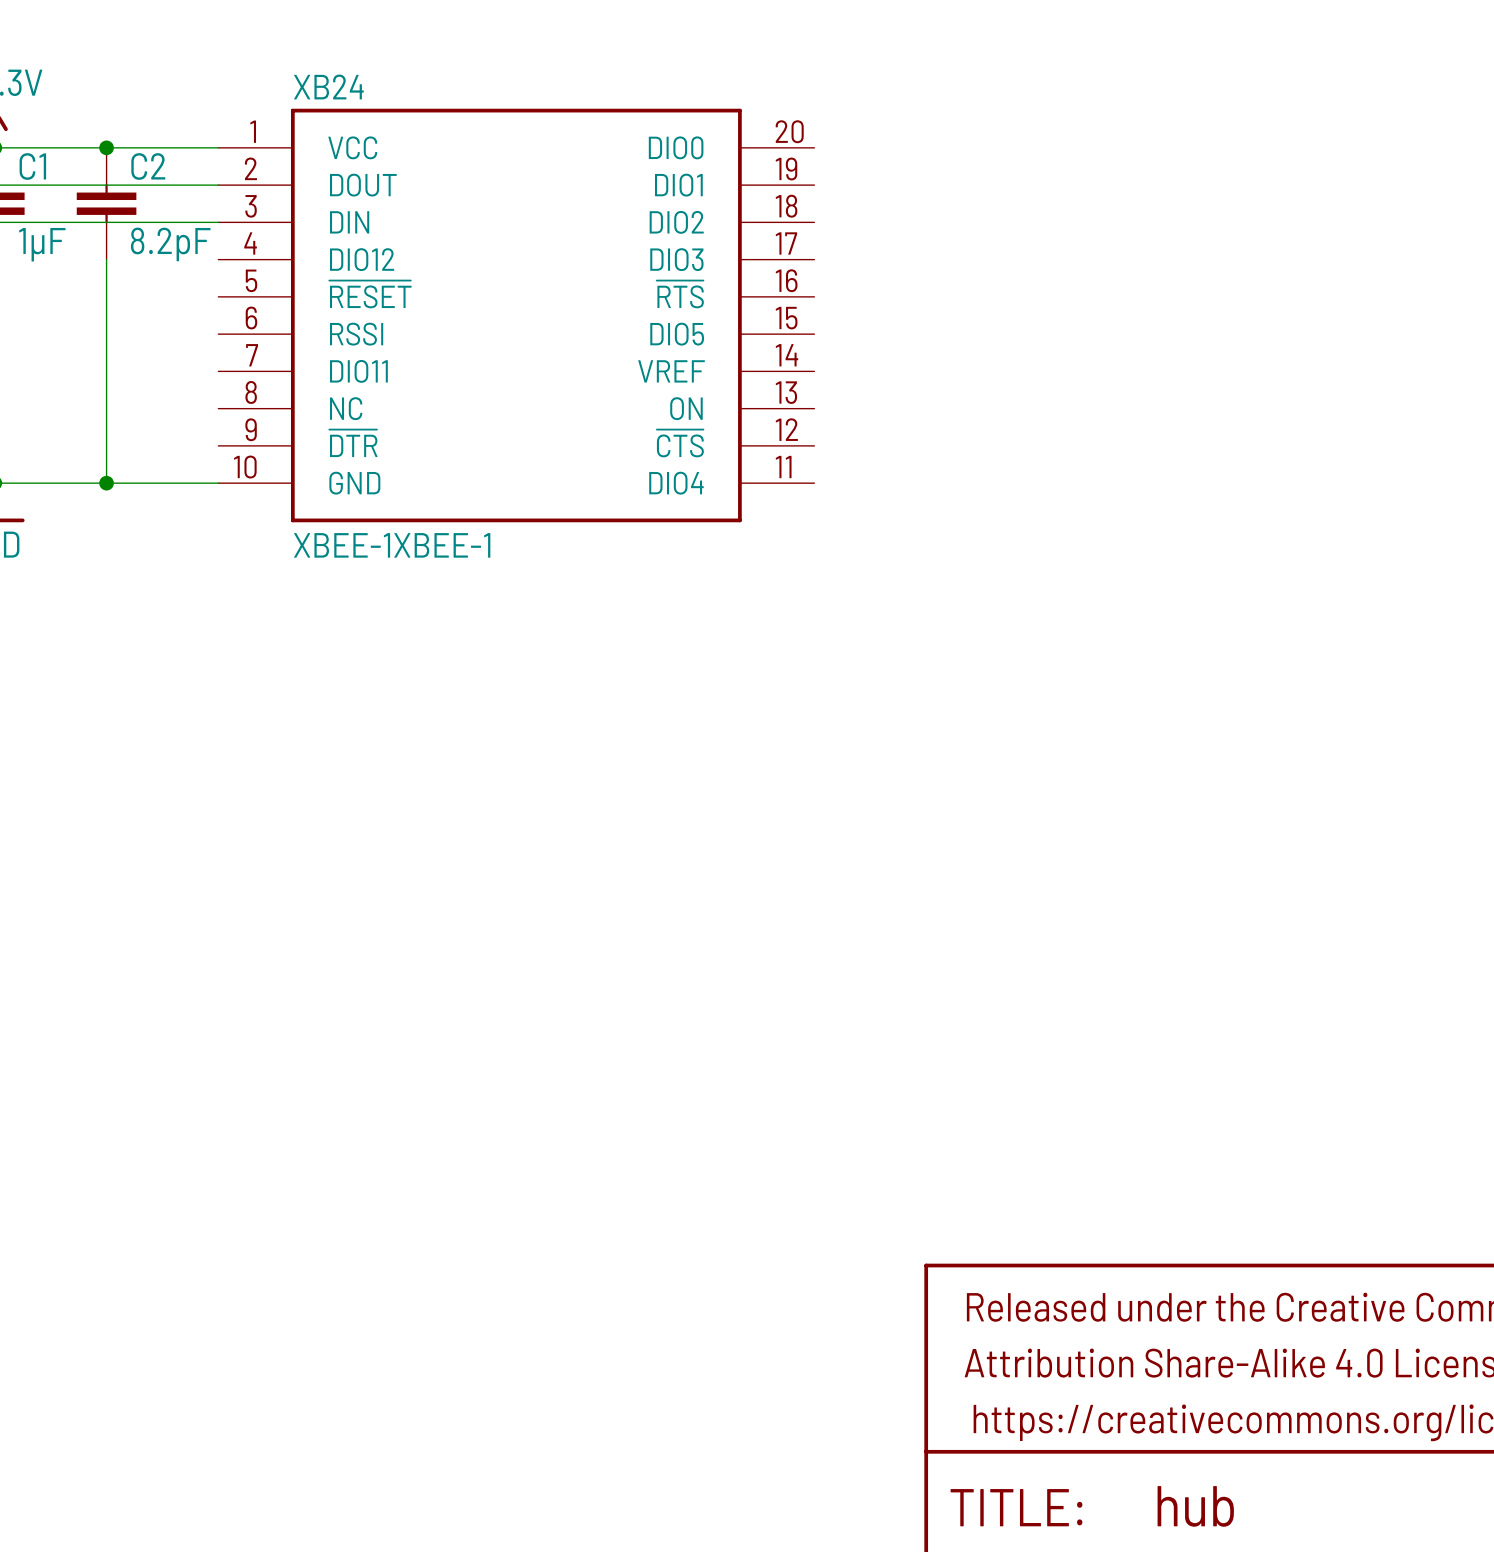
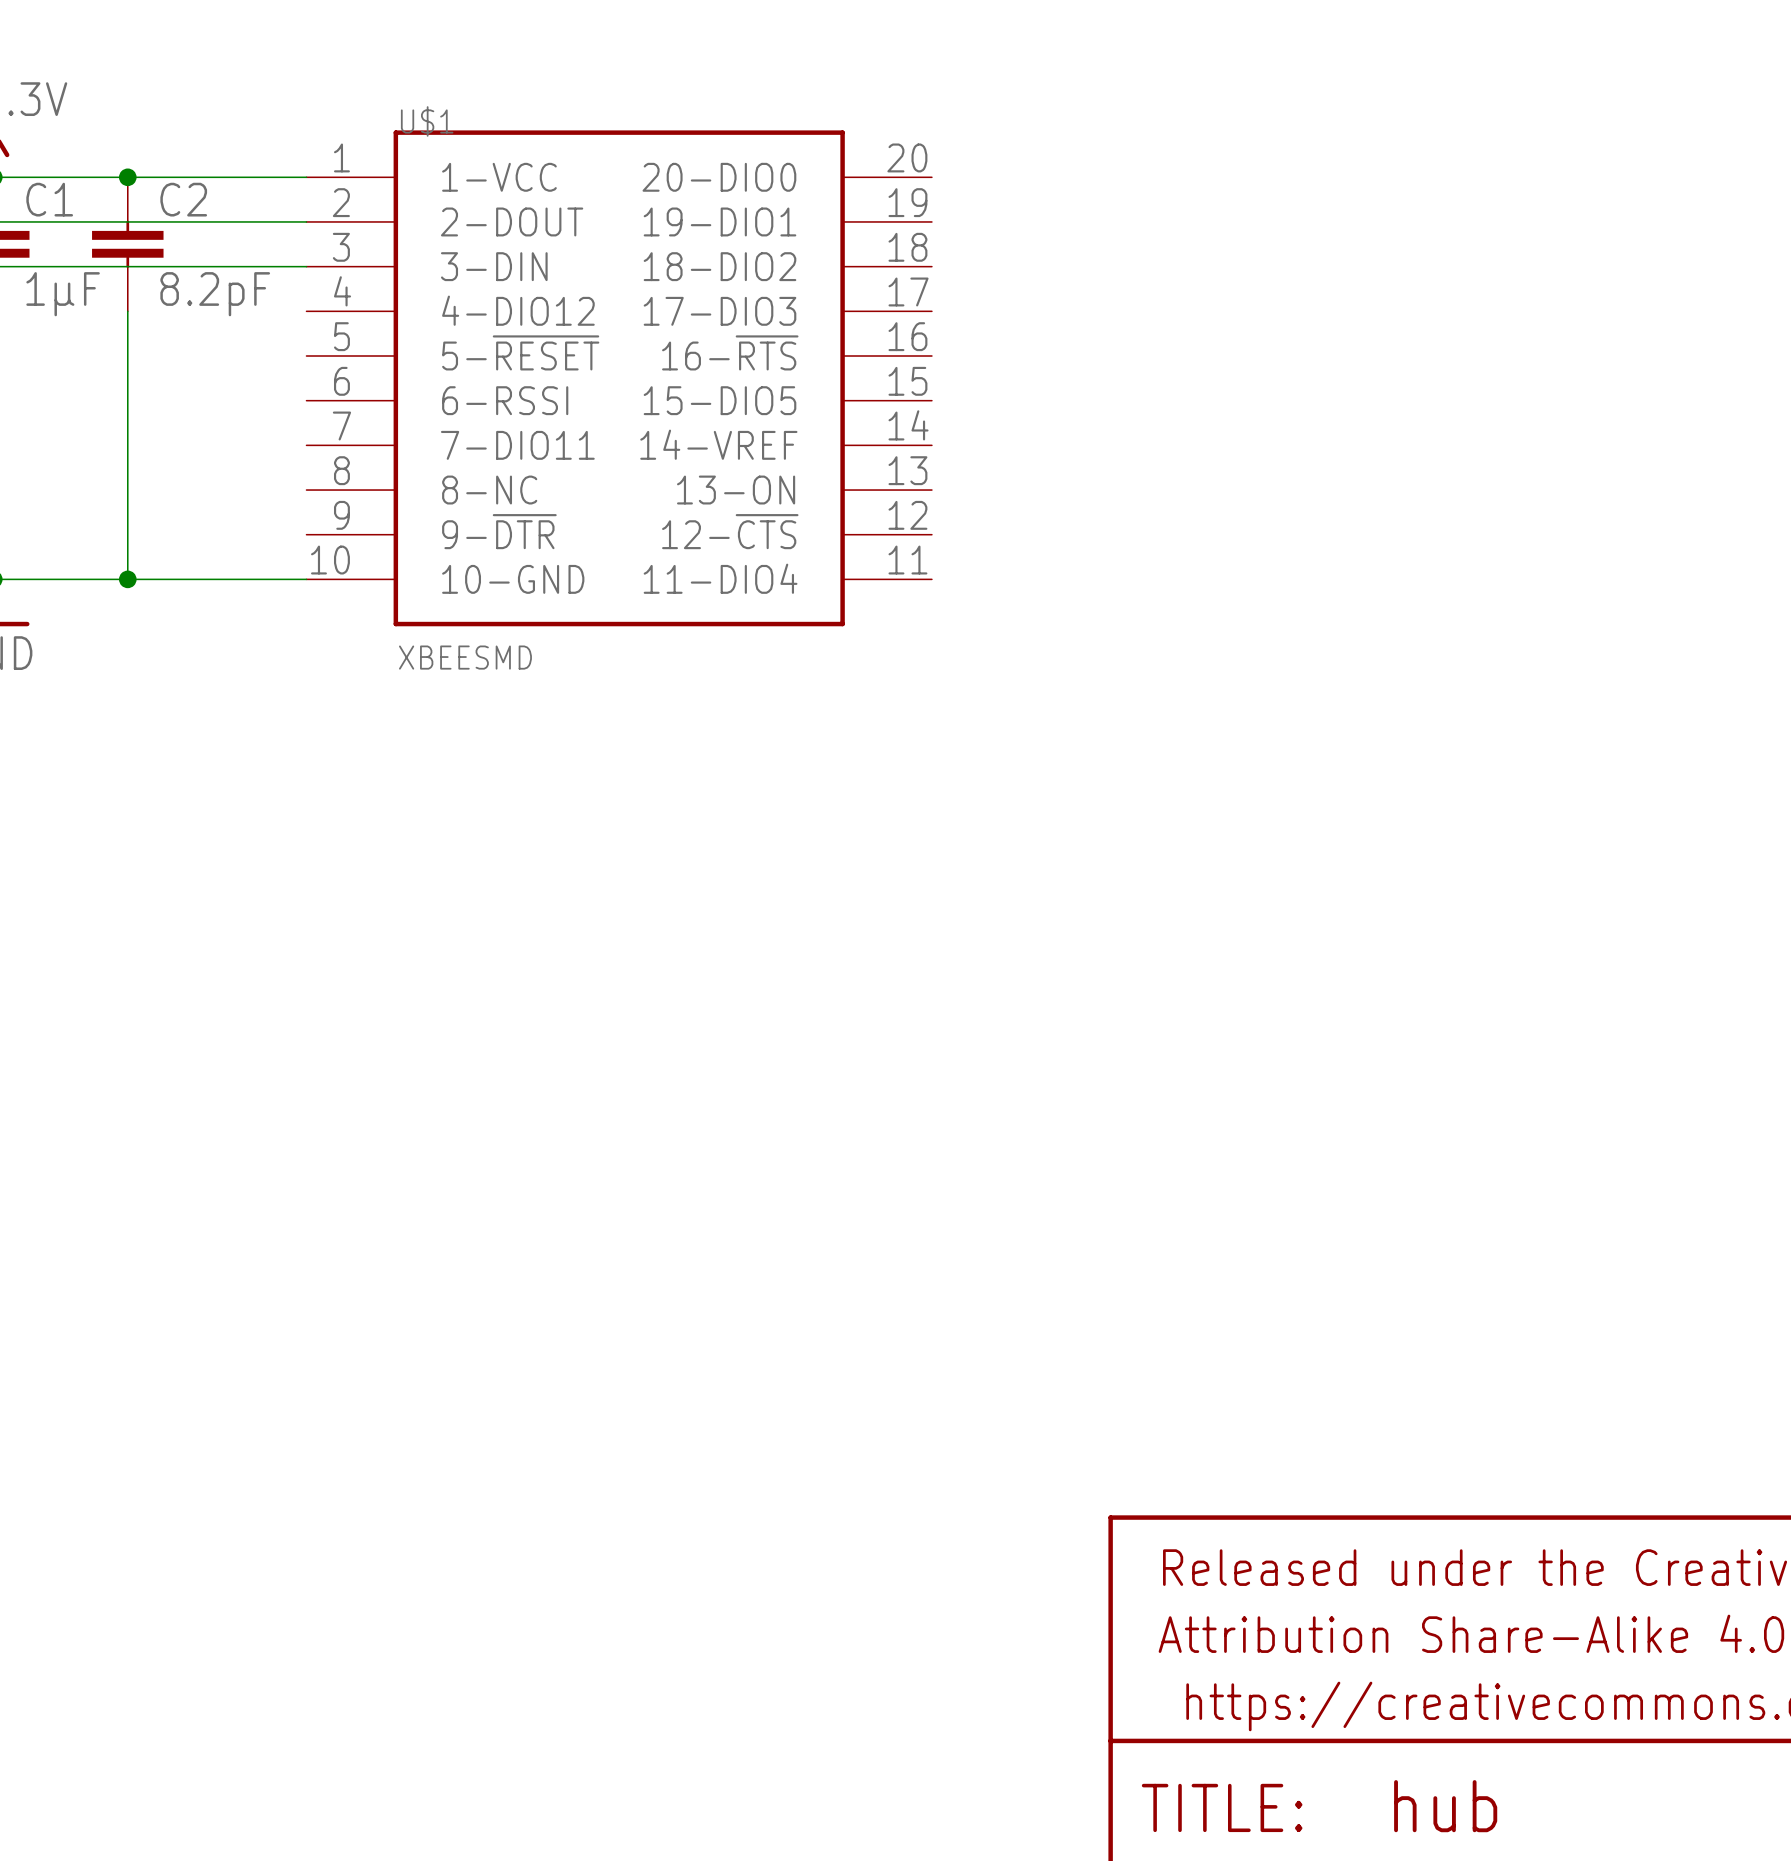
XB24: XBEE-1XBEE-1 (516, 315) -> none
U$1: none -> XBEESMD (619, 378)

